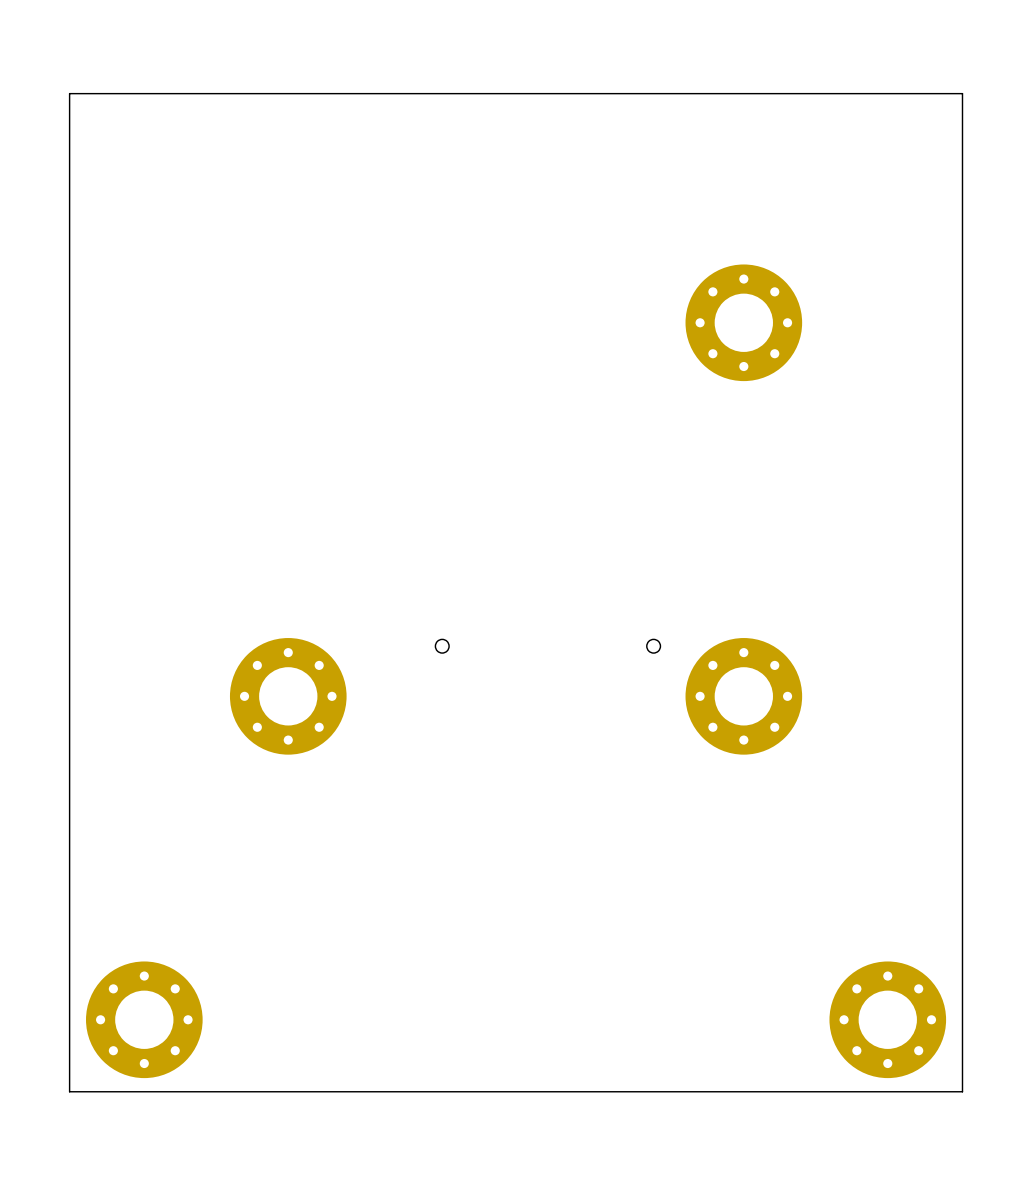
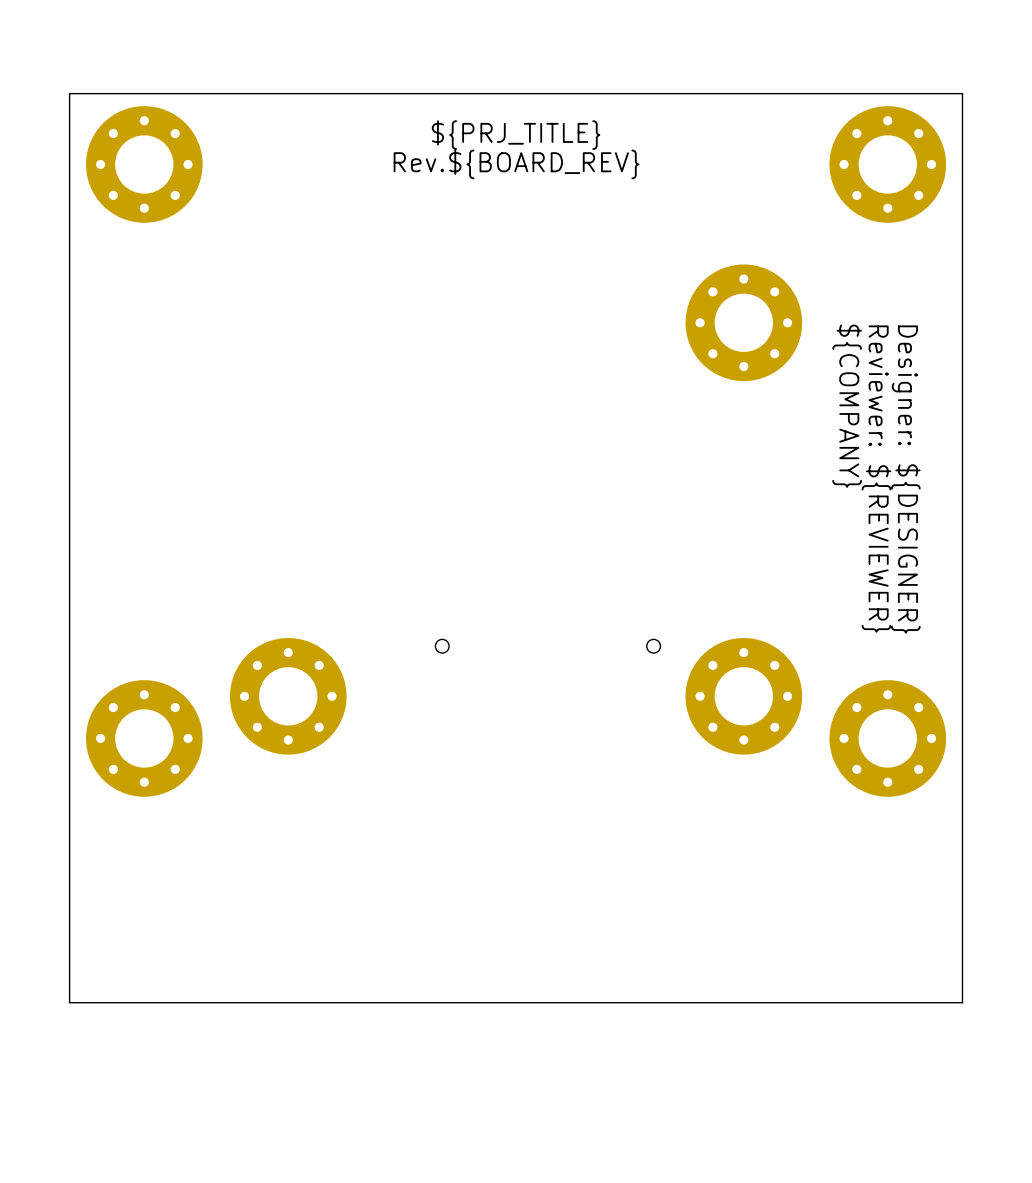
text: none -> ${PRJ_TITLE} (516, 135)
text: none -> Rev.${BOARD_REV} (516, 164)
part: none -> (144, 164)
part: none -> (887, 164)
text: none -> ${COMPANY} (847, 406)
text: none -> Designer: ${DESIGNER} (905, 479)
text: none -> Reviewer: ${REVIEWER} (876, 479)
board edge: (962, 1002) (962, 1091) (69, 1091) (69, 1002) -> (962, 1002) (69, 1002)
part position: (144, 1019) -> (144, 738)
part position: (887, 1019) -> (887, 738)

